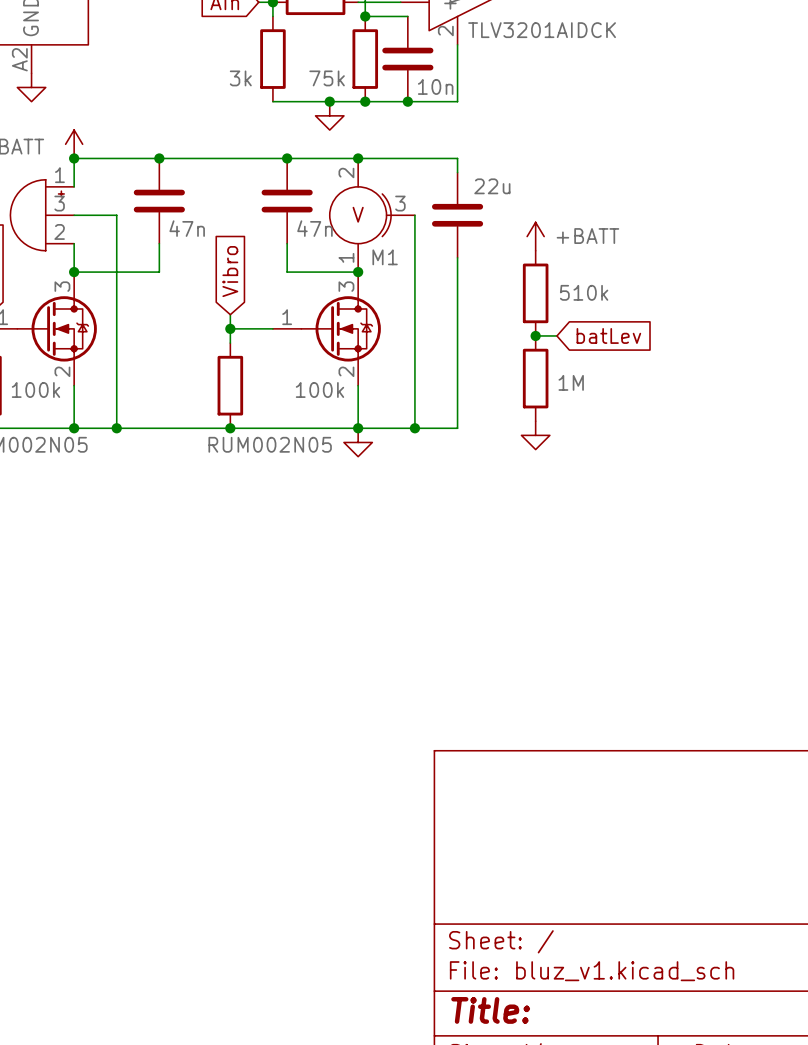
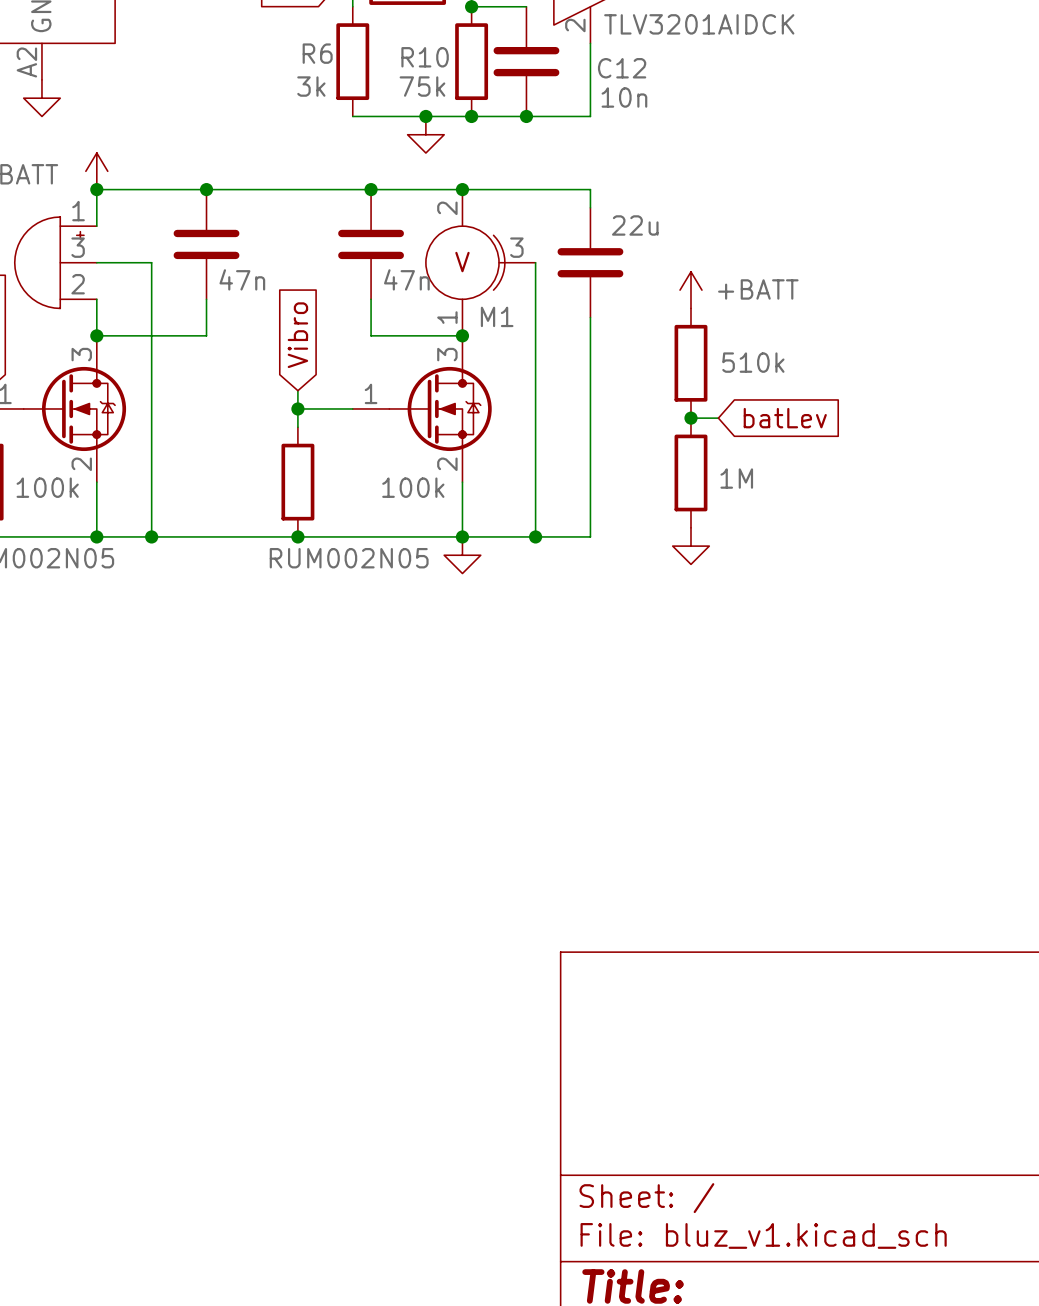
R6 name: none -> R6 (317, 53)
R10 name: none -> R10 (425, 57)
C12 name: none -> C12 (622, 68)
C12 value position: 10n (435, 86) -> 10n (624, 97)

